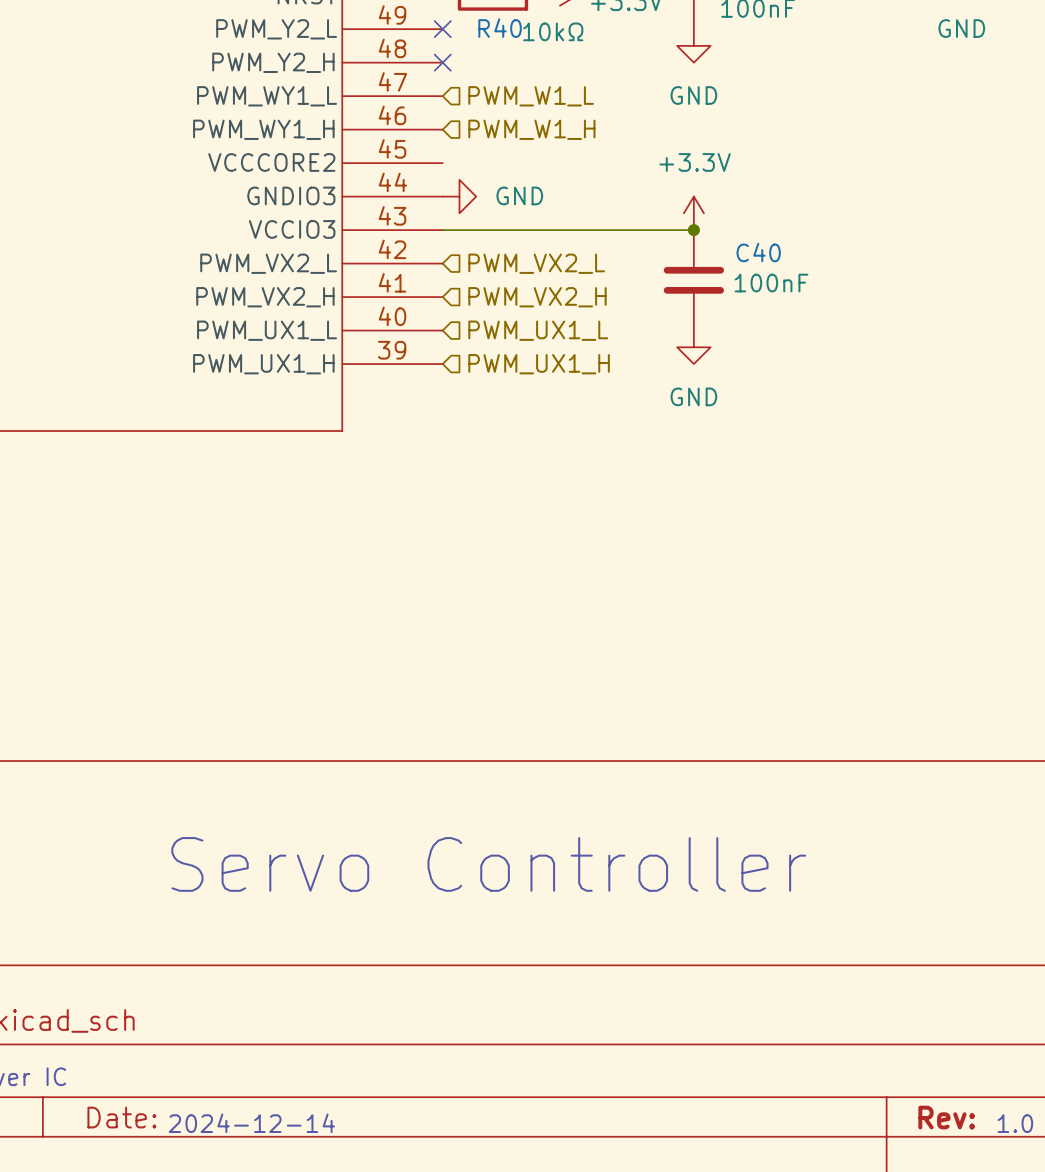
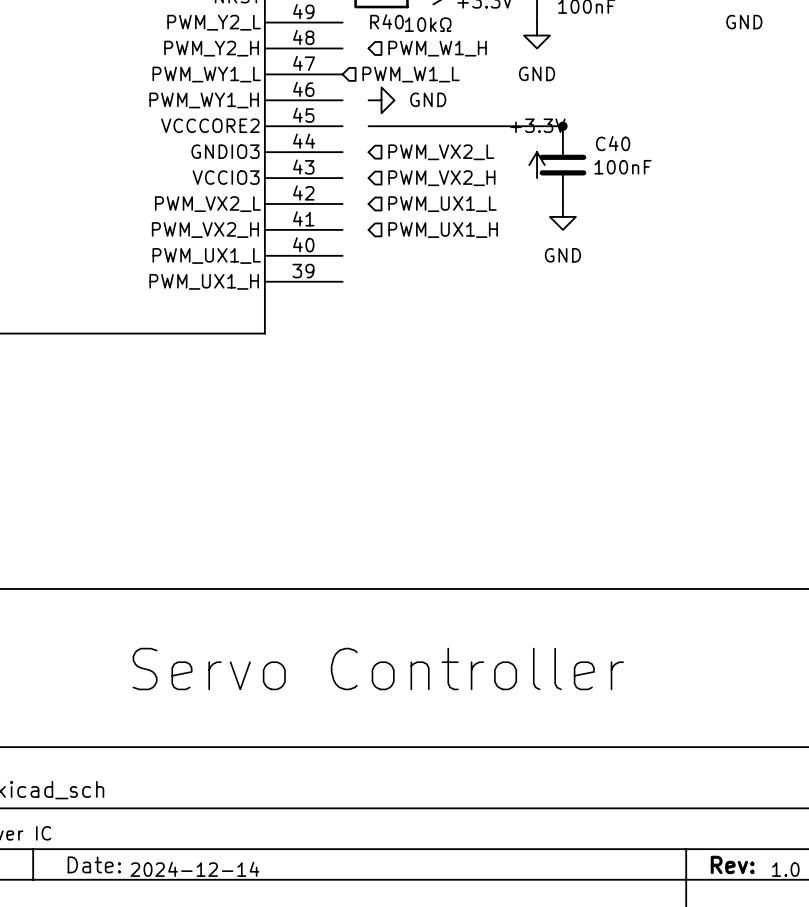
no-connect mark: (442, 29) -> none
no-connect mark: (442, 62) -> none
hierarchical label position: PWM_W1_H (531, 129) -> PWM_W1_H (437, 48)
power symbol position: GND (459, 196) -> GND (381, 100)
wire: (442, 230) (693, 230) -> (368, 126) (562, 126)
junction position: (693, 230) -> (562, 126)
hierarchical label position: PWM_VX2_L (536, 263) -> PWM_VX2_L (441, 152)
C40 position: (693, 280) -> (562, 165)
hierarchical label position: PWM_VX2_H (537, 297) -> PWM_VX2_H (441, 178)
hierarchical label position: PWM_UX1_L (538, 330) -> PWM_UX1_L (442, 204)
power symbol position: GND (693, 347) -> GND (562, 216)
hierarchical label position: PWM_UX1_H (539, 364) -> PWM_UX1_H (443, 230)

